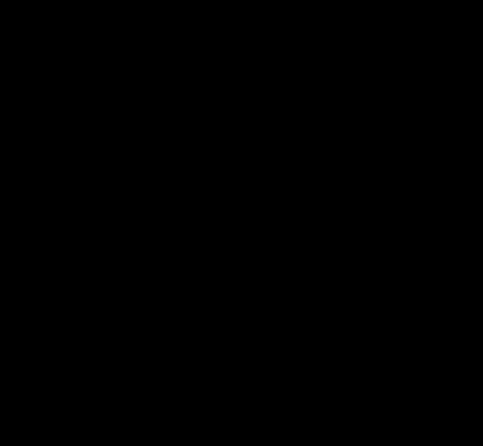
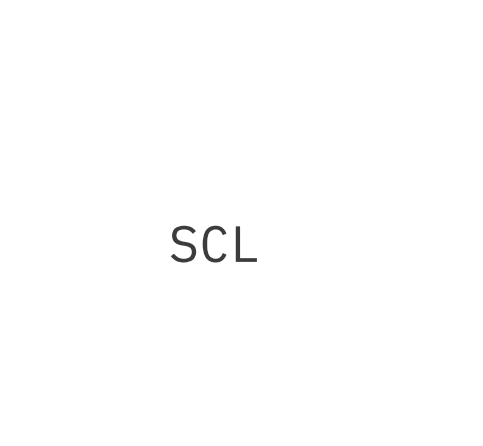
drawing: none -> [170, 225, 257, 263]

